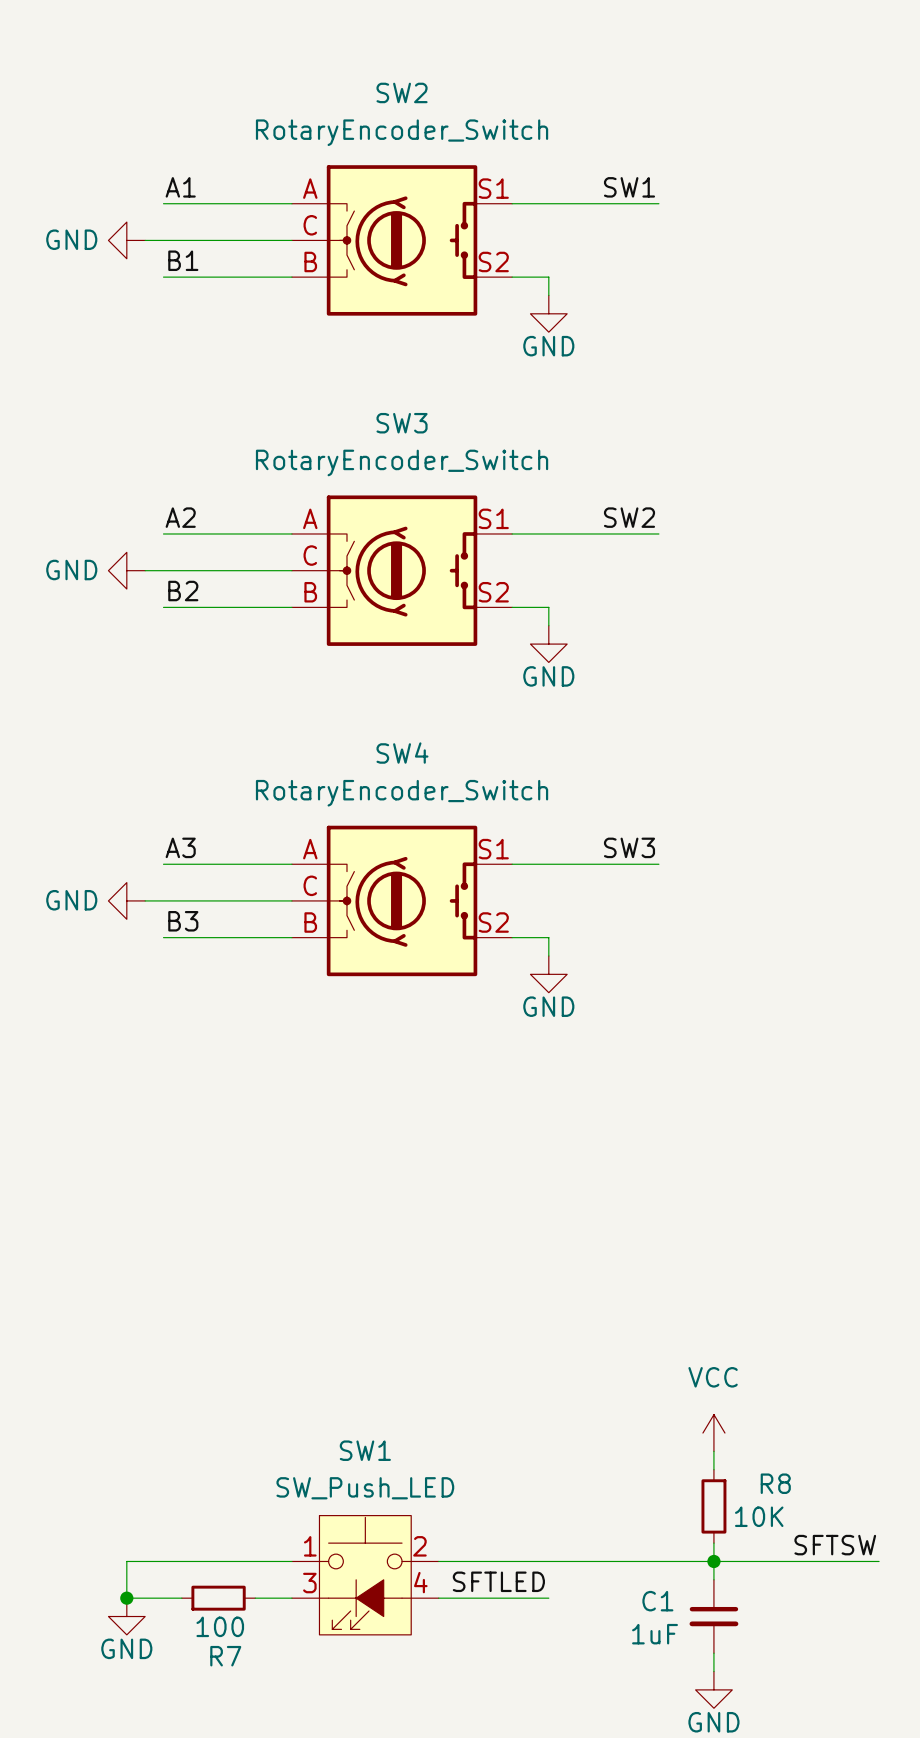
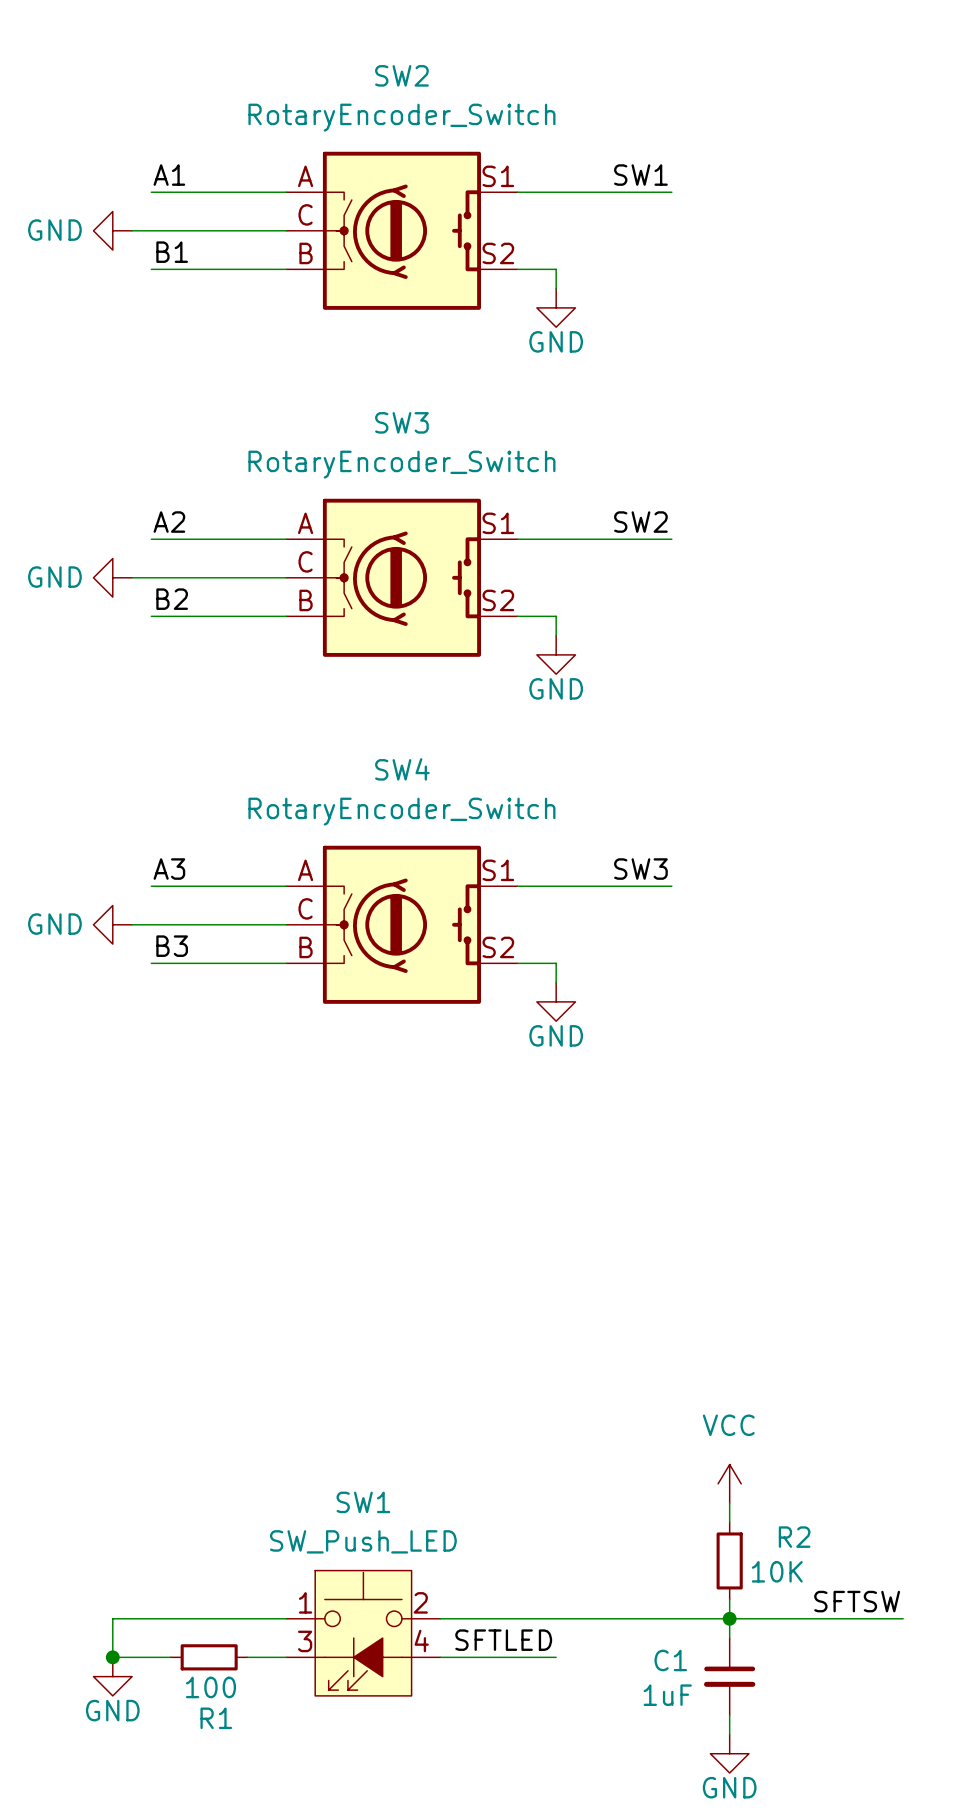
R8 name: R8 (775, 1483) -> R2 (794, 1537)
R7 name: R7 (225, 1656) -> R1 (216, 1718)

